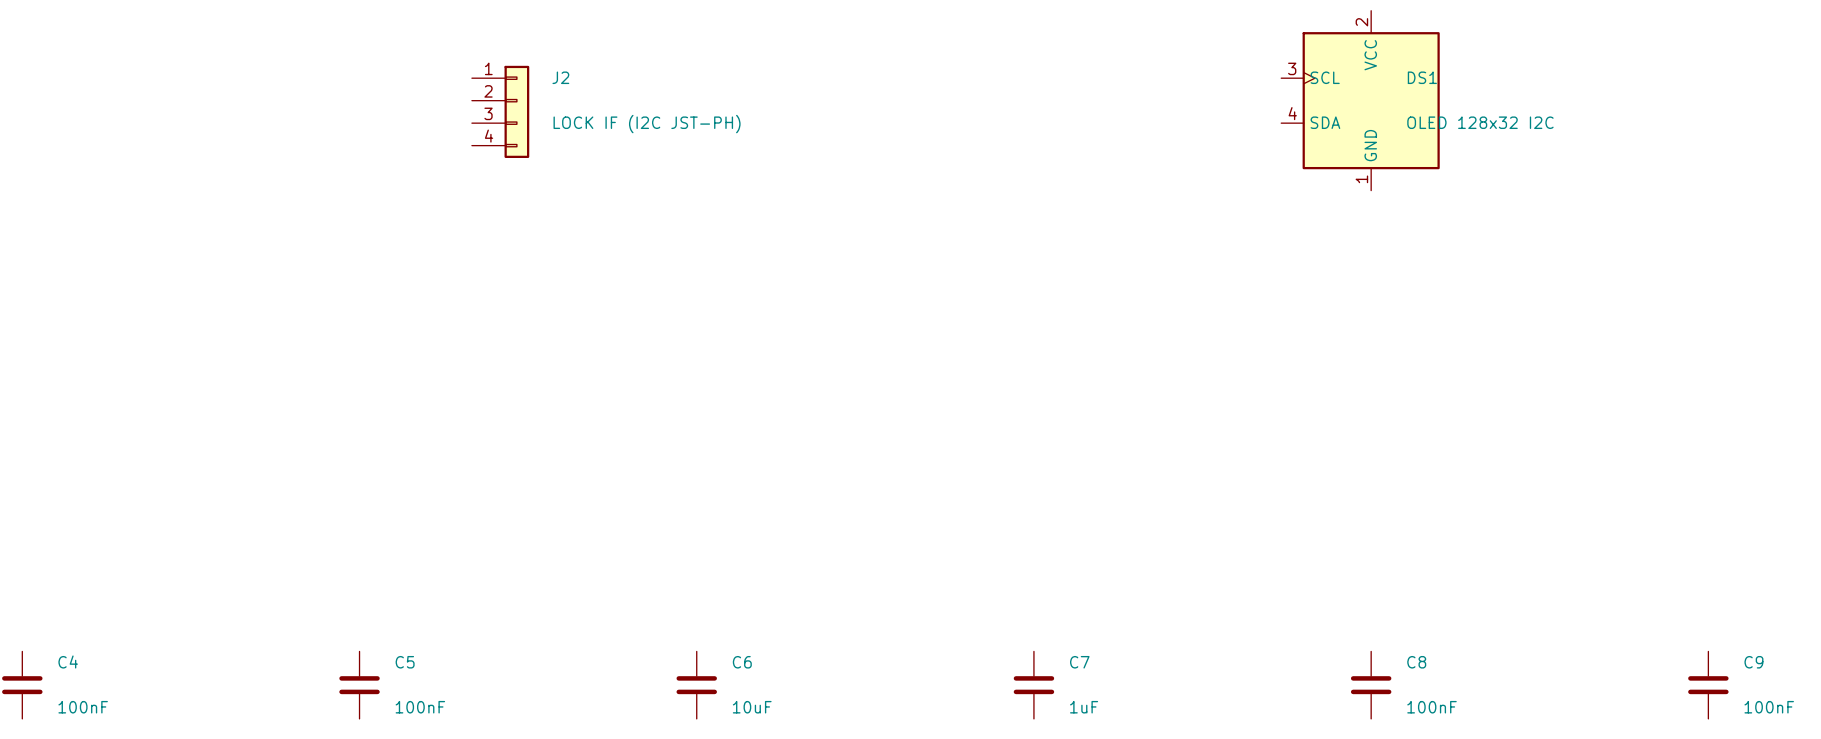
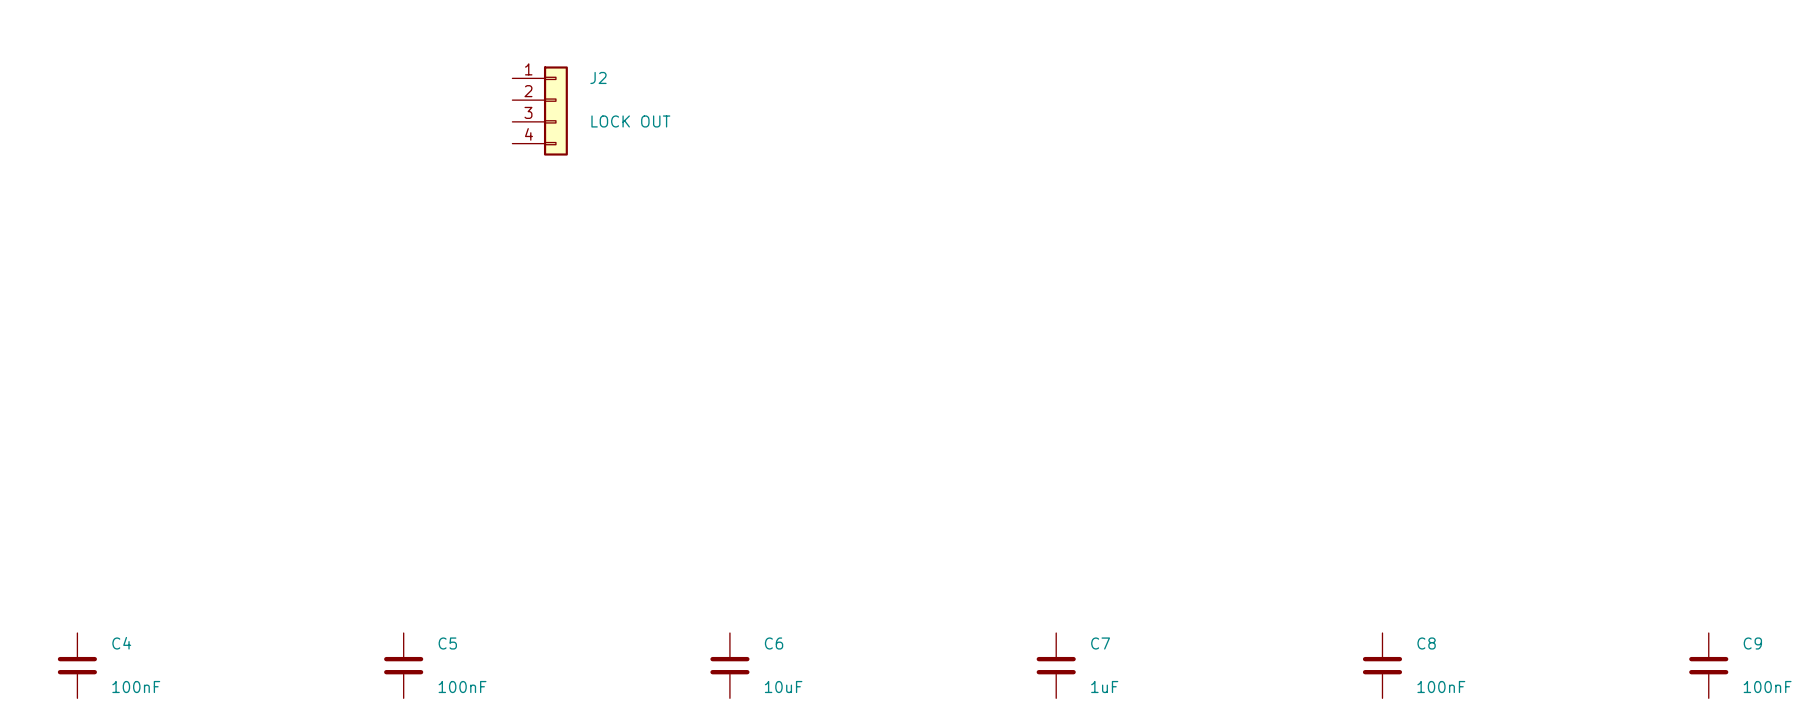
DS1: OLED 128x32 I2C (1360, 100) -> none
J2 value: LOCK IF (I2C JST-PH) (647, 124) -> LOCK OUT (630, 121)

